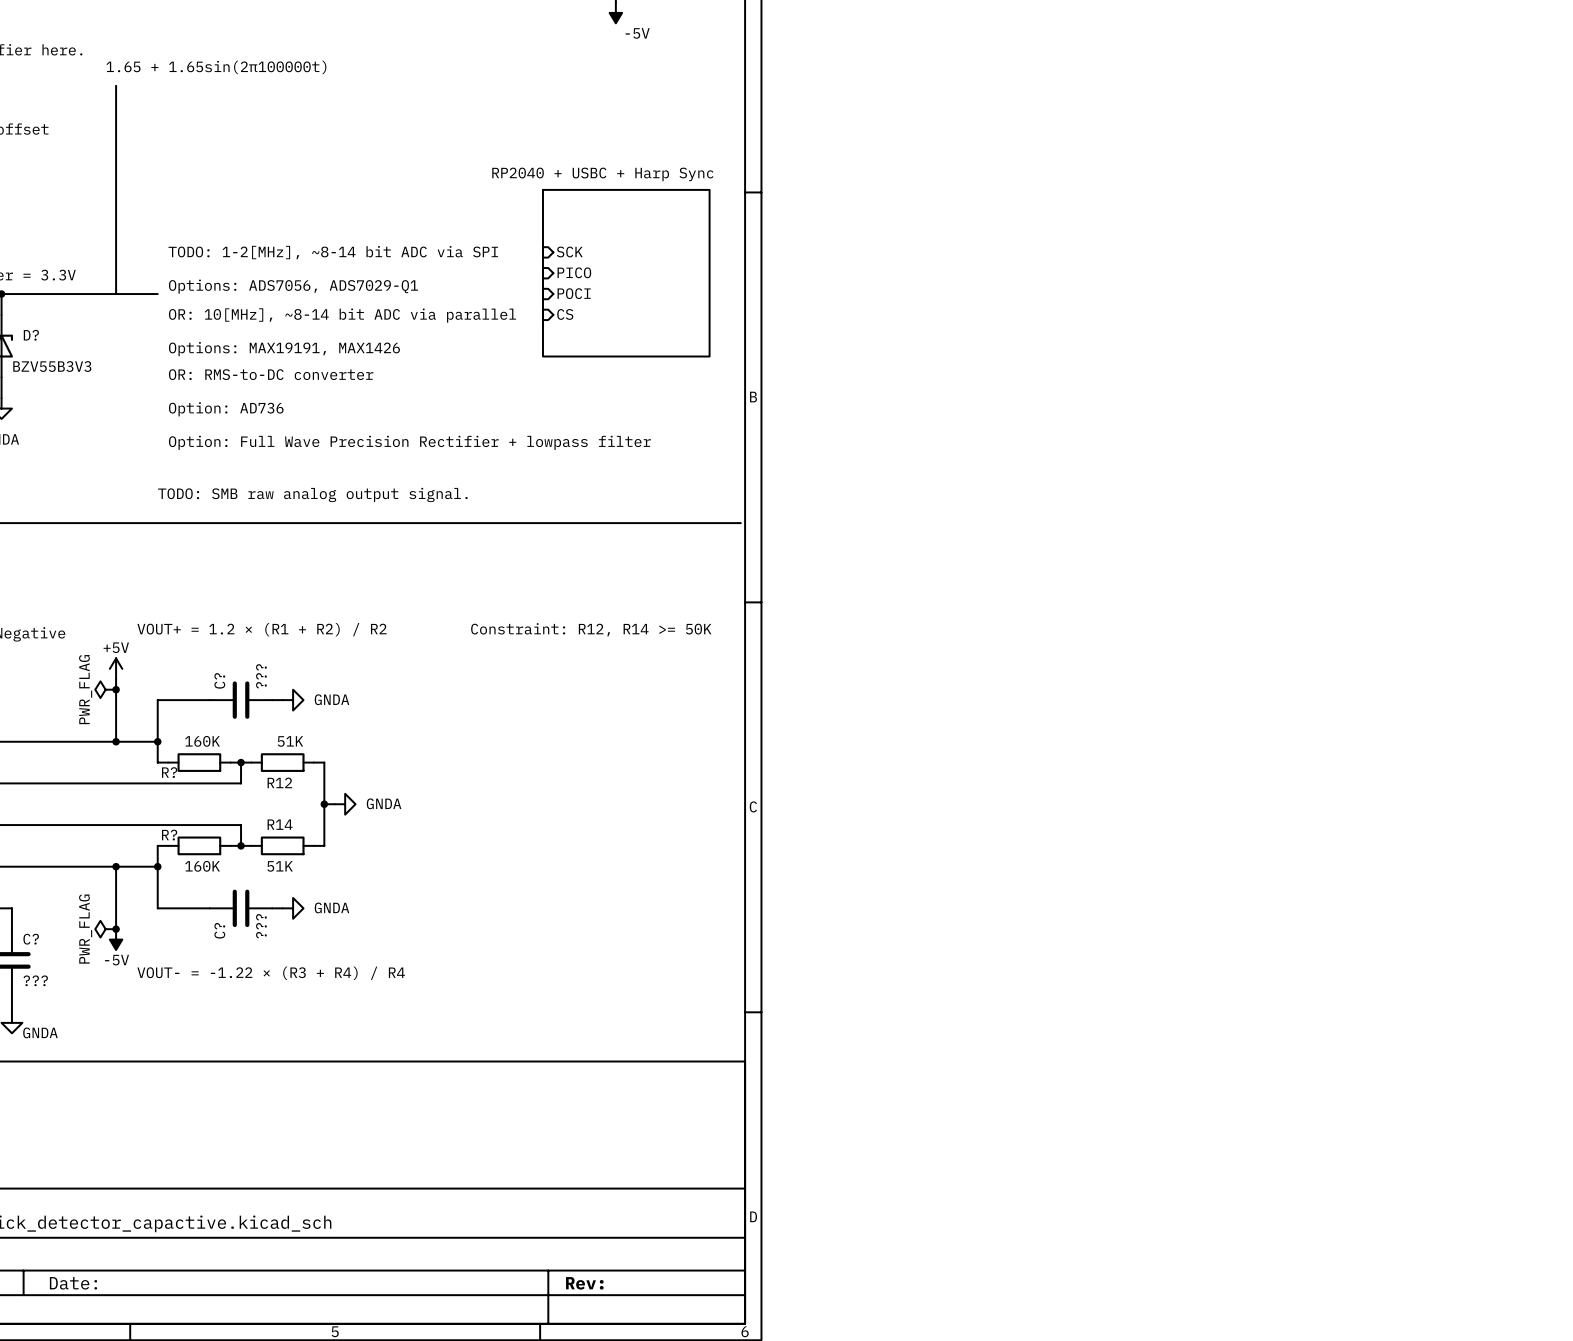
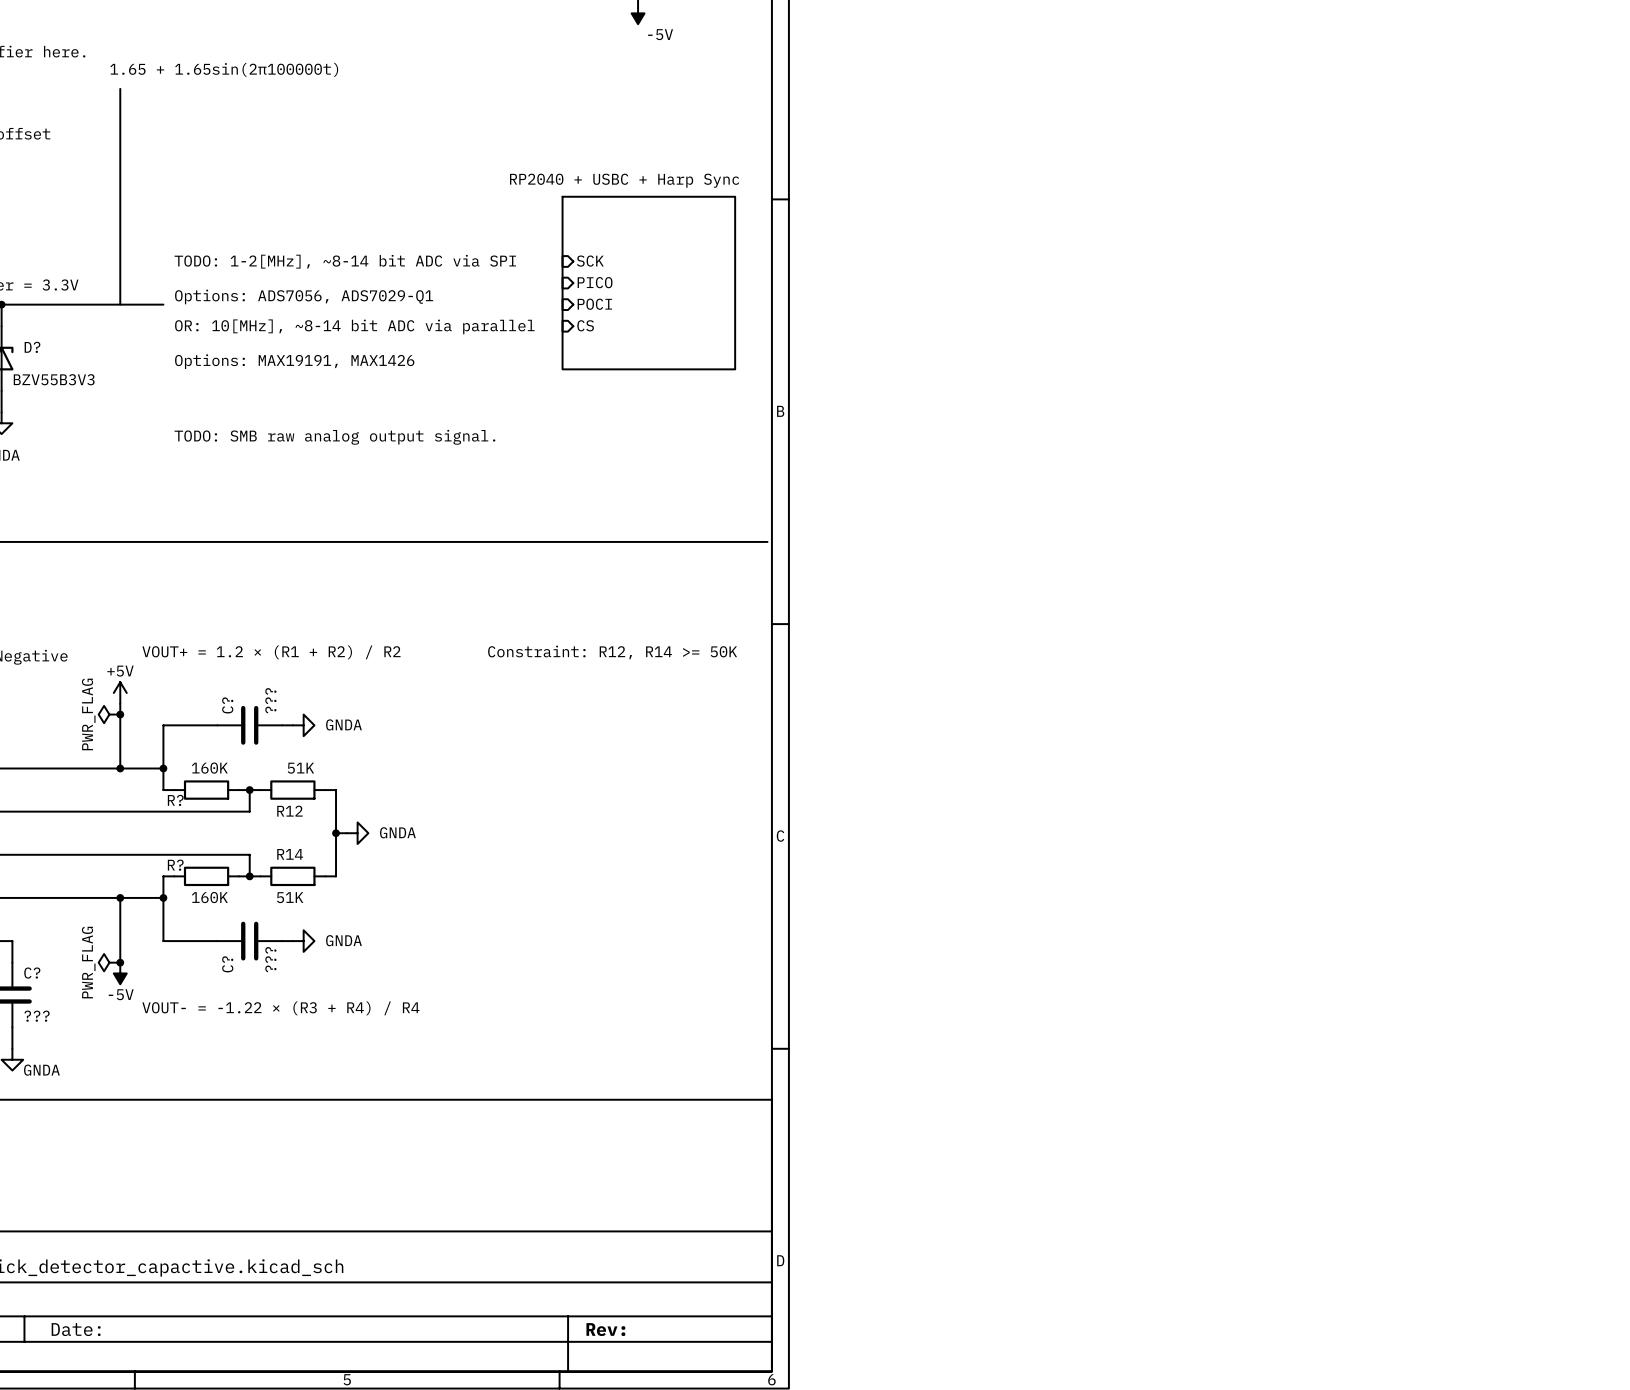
text: OR: RMS-to-DC converter (271, 374) -> none
text: Option: AD736 (226, 409) -> none
text: Option: Full Wave Precision Rectifier + lowpass filter (409, 442) -> none
text position: TODO: SMB raw analog output signal. (312, 494) -> TODO: SMB raw analog output signal. (334, 437)

